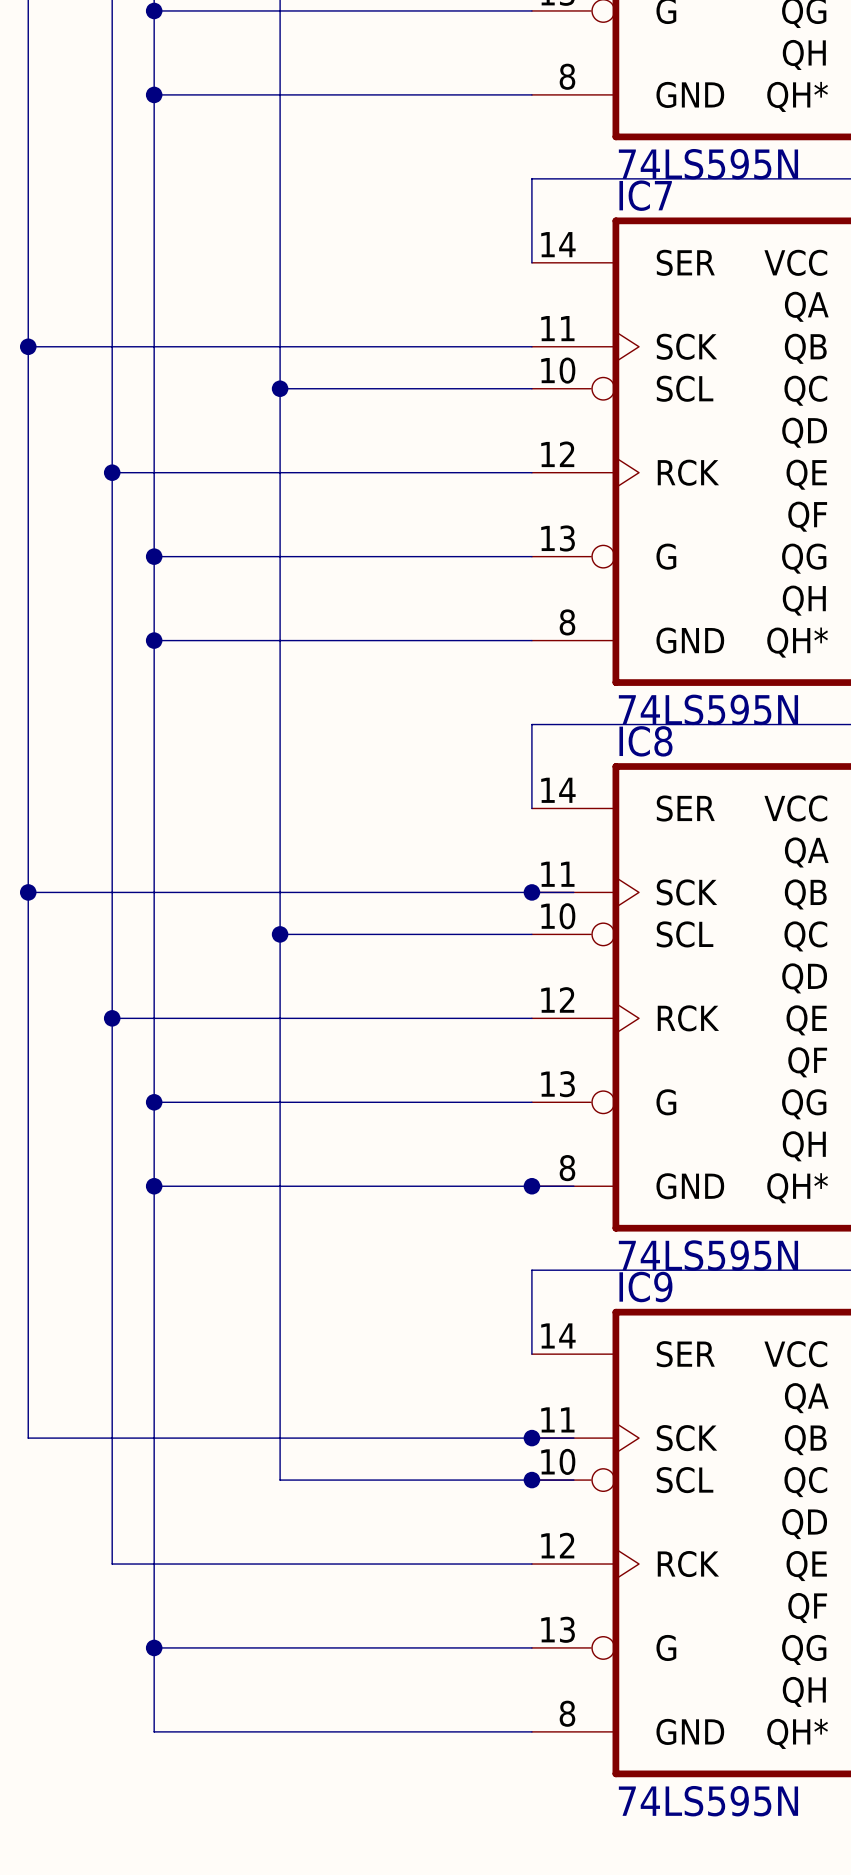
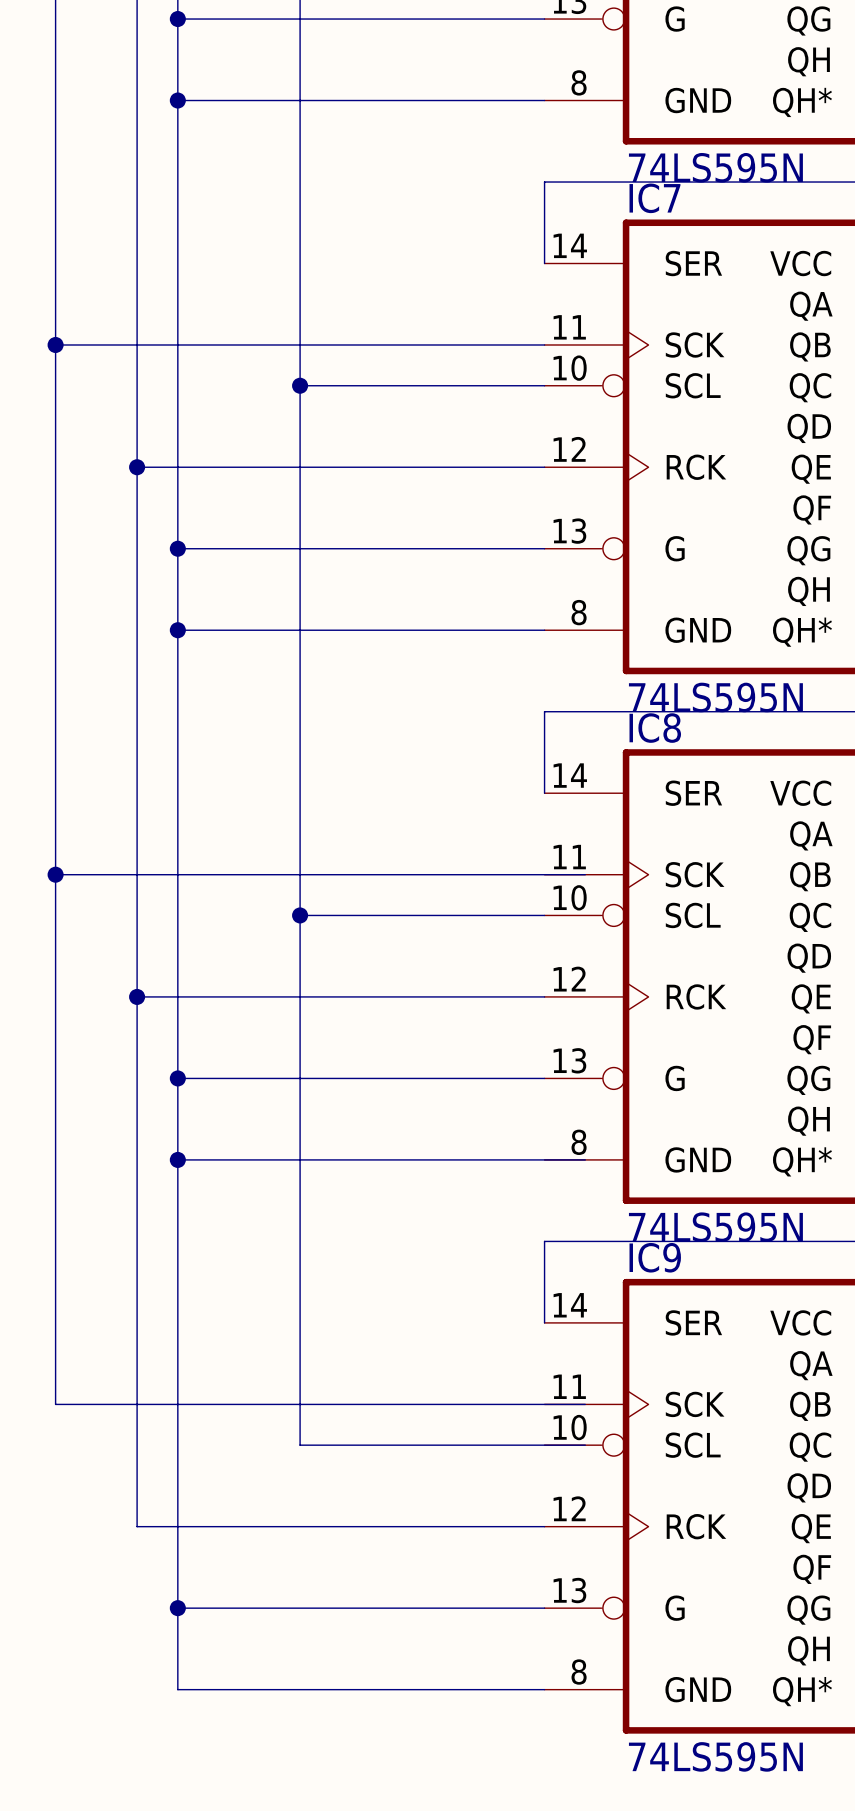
junction: (531, 892) -> none
junction: (531, 1186) -> none
junction: (531, 1438) -> none
junction: (531, 1480) -> none

